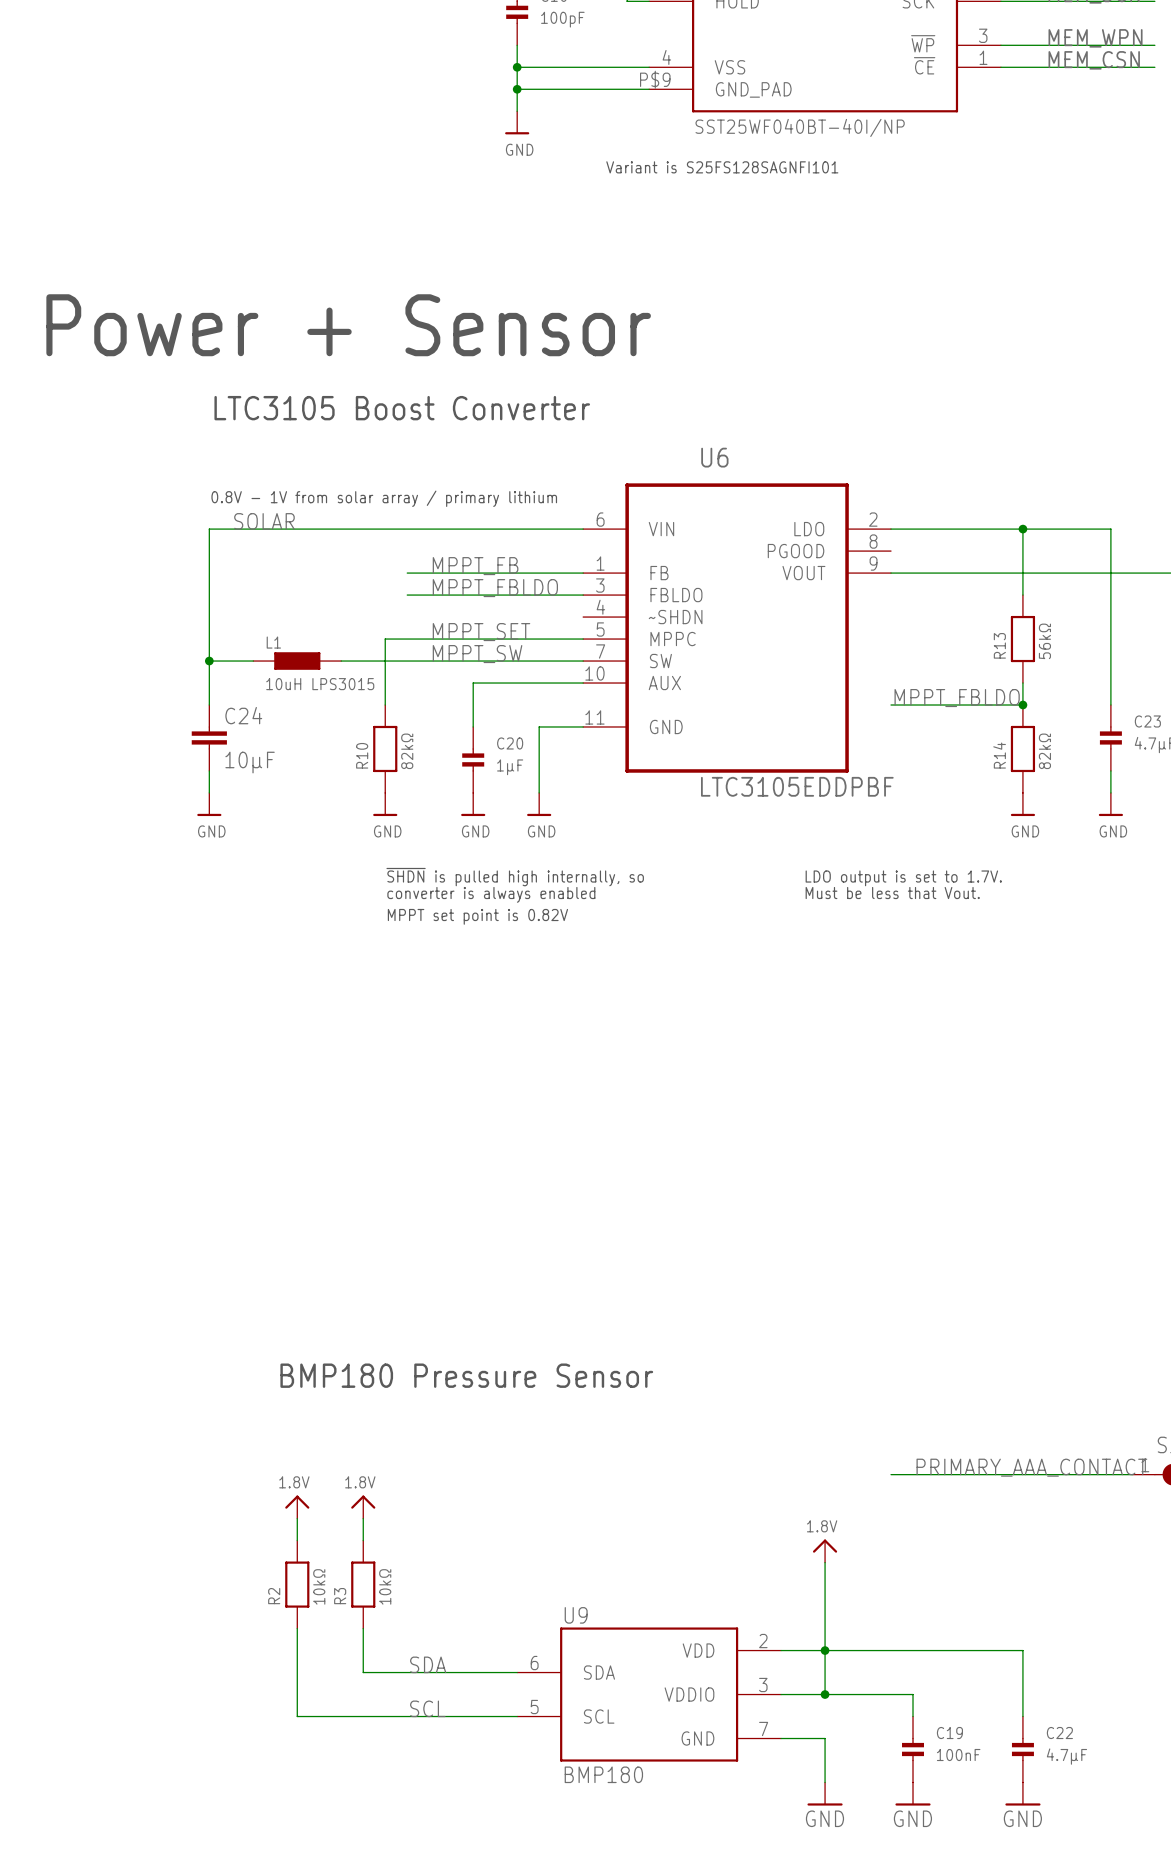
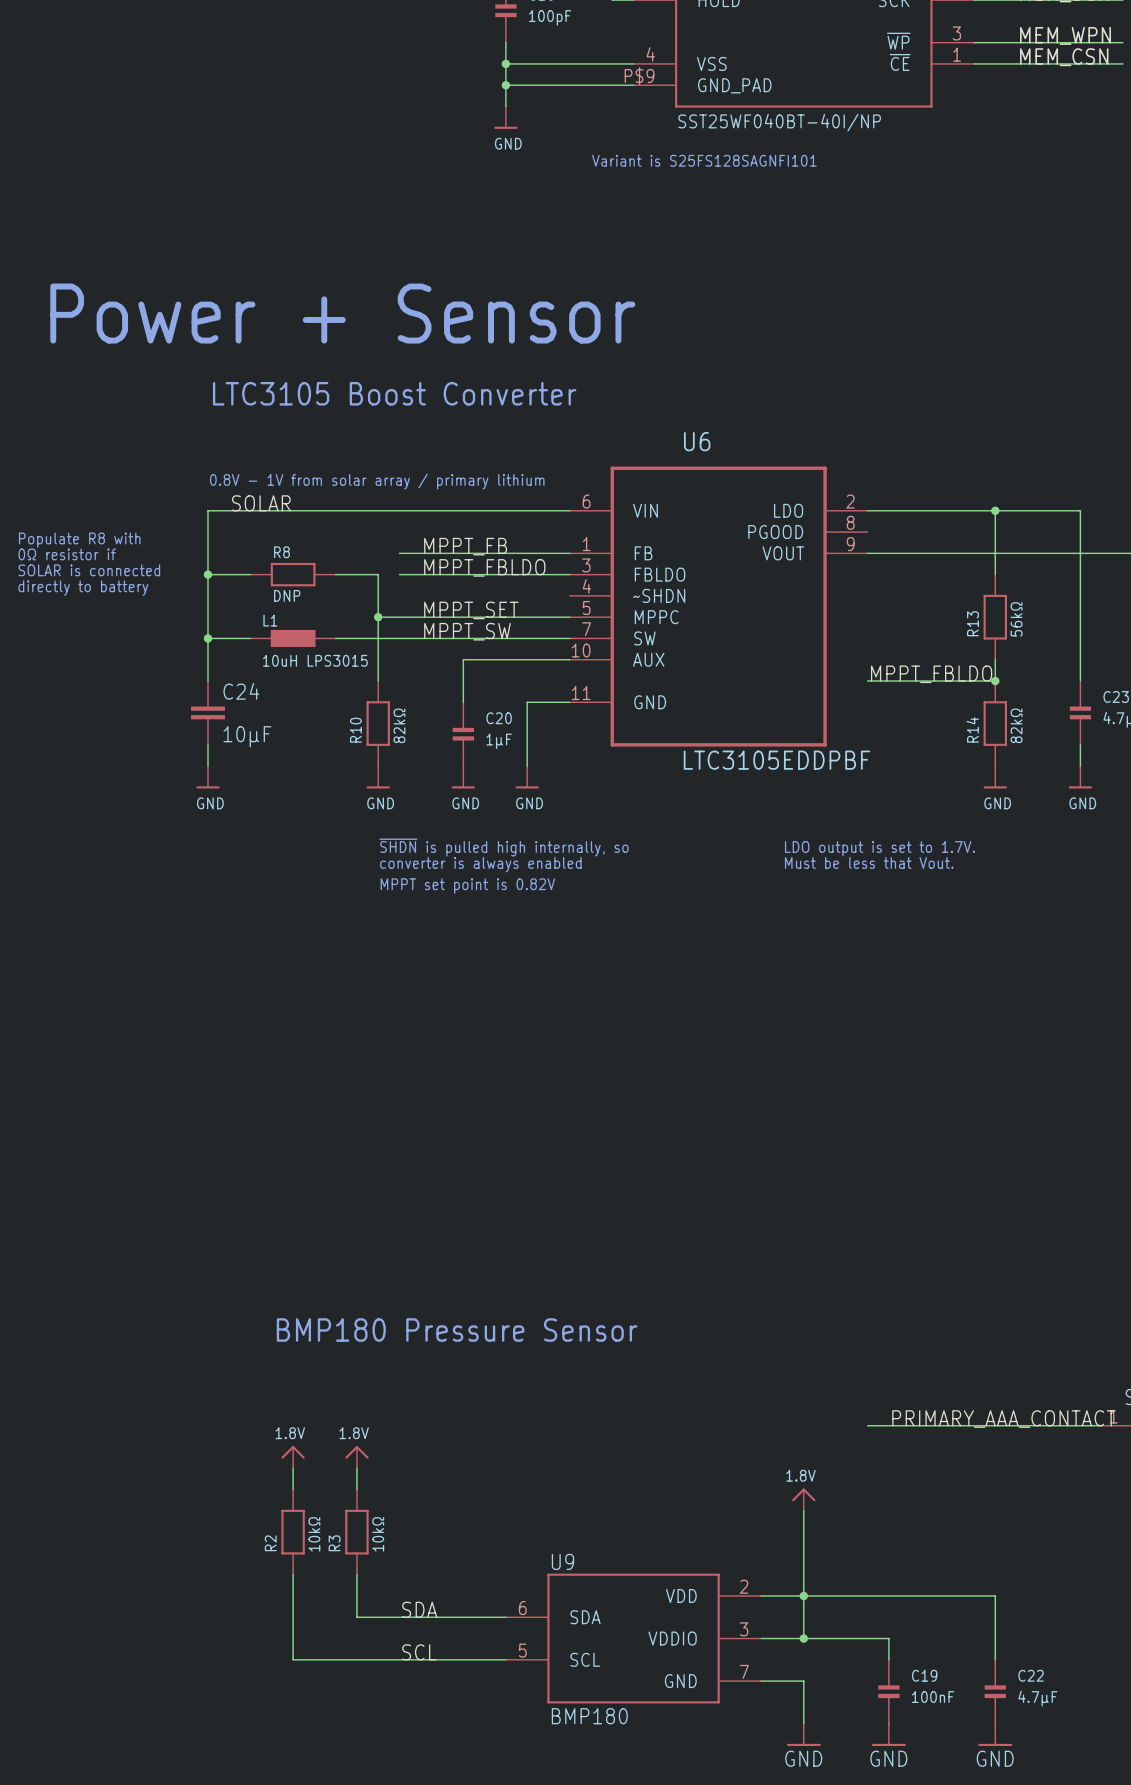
text: none -> Populate R8 with (79, 540)
text: none -> 0Ω resistor if (67, 554)
text: none -> SOLAR is connected (89, 570)
wire: none -> (208, 574) (250, 574)
junction: none -> (208, 574)
R8: none -> DNP (293, 574)
wire: none -> (335, 574) (378, 574) (378, 617)
text: none -> directly to battery (83, 588)
junction: none -> (378, 617)

